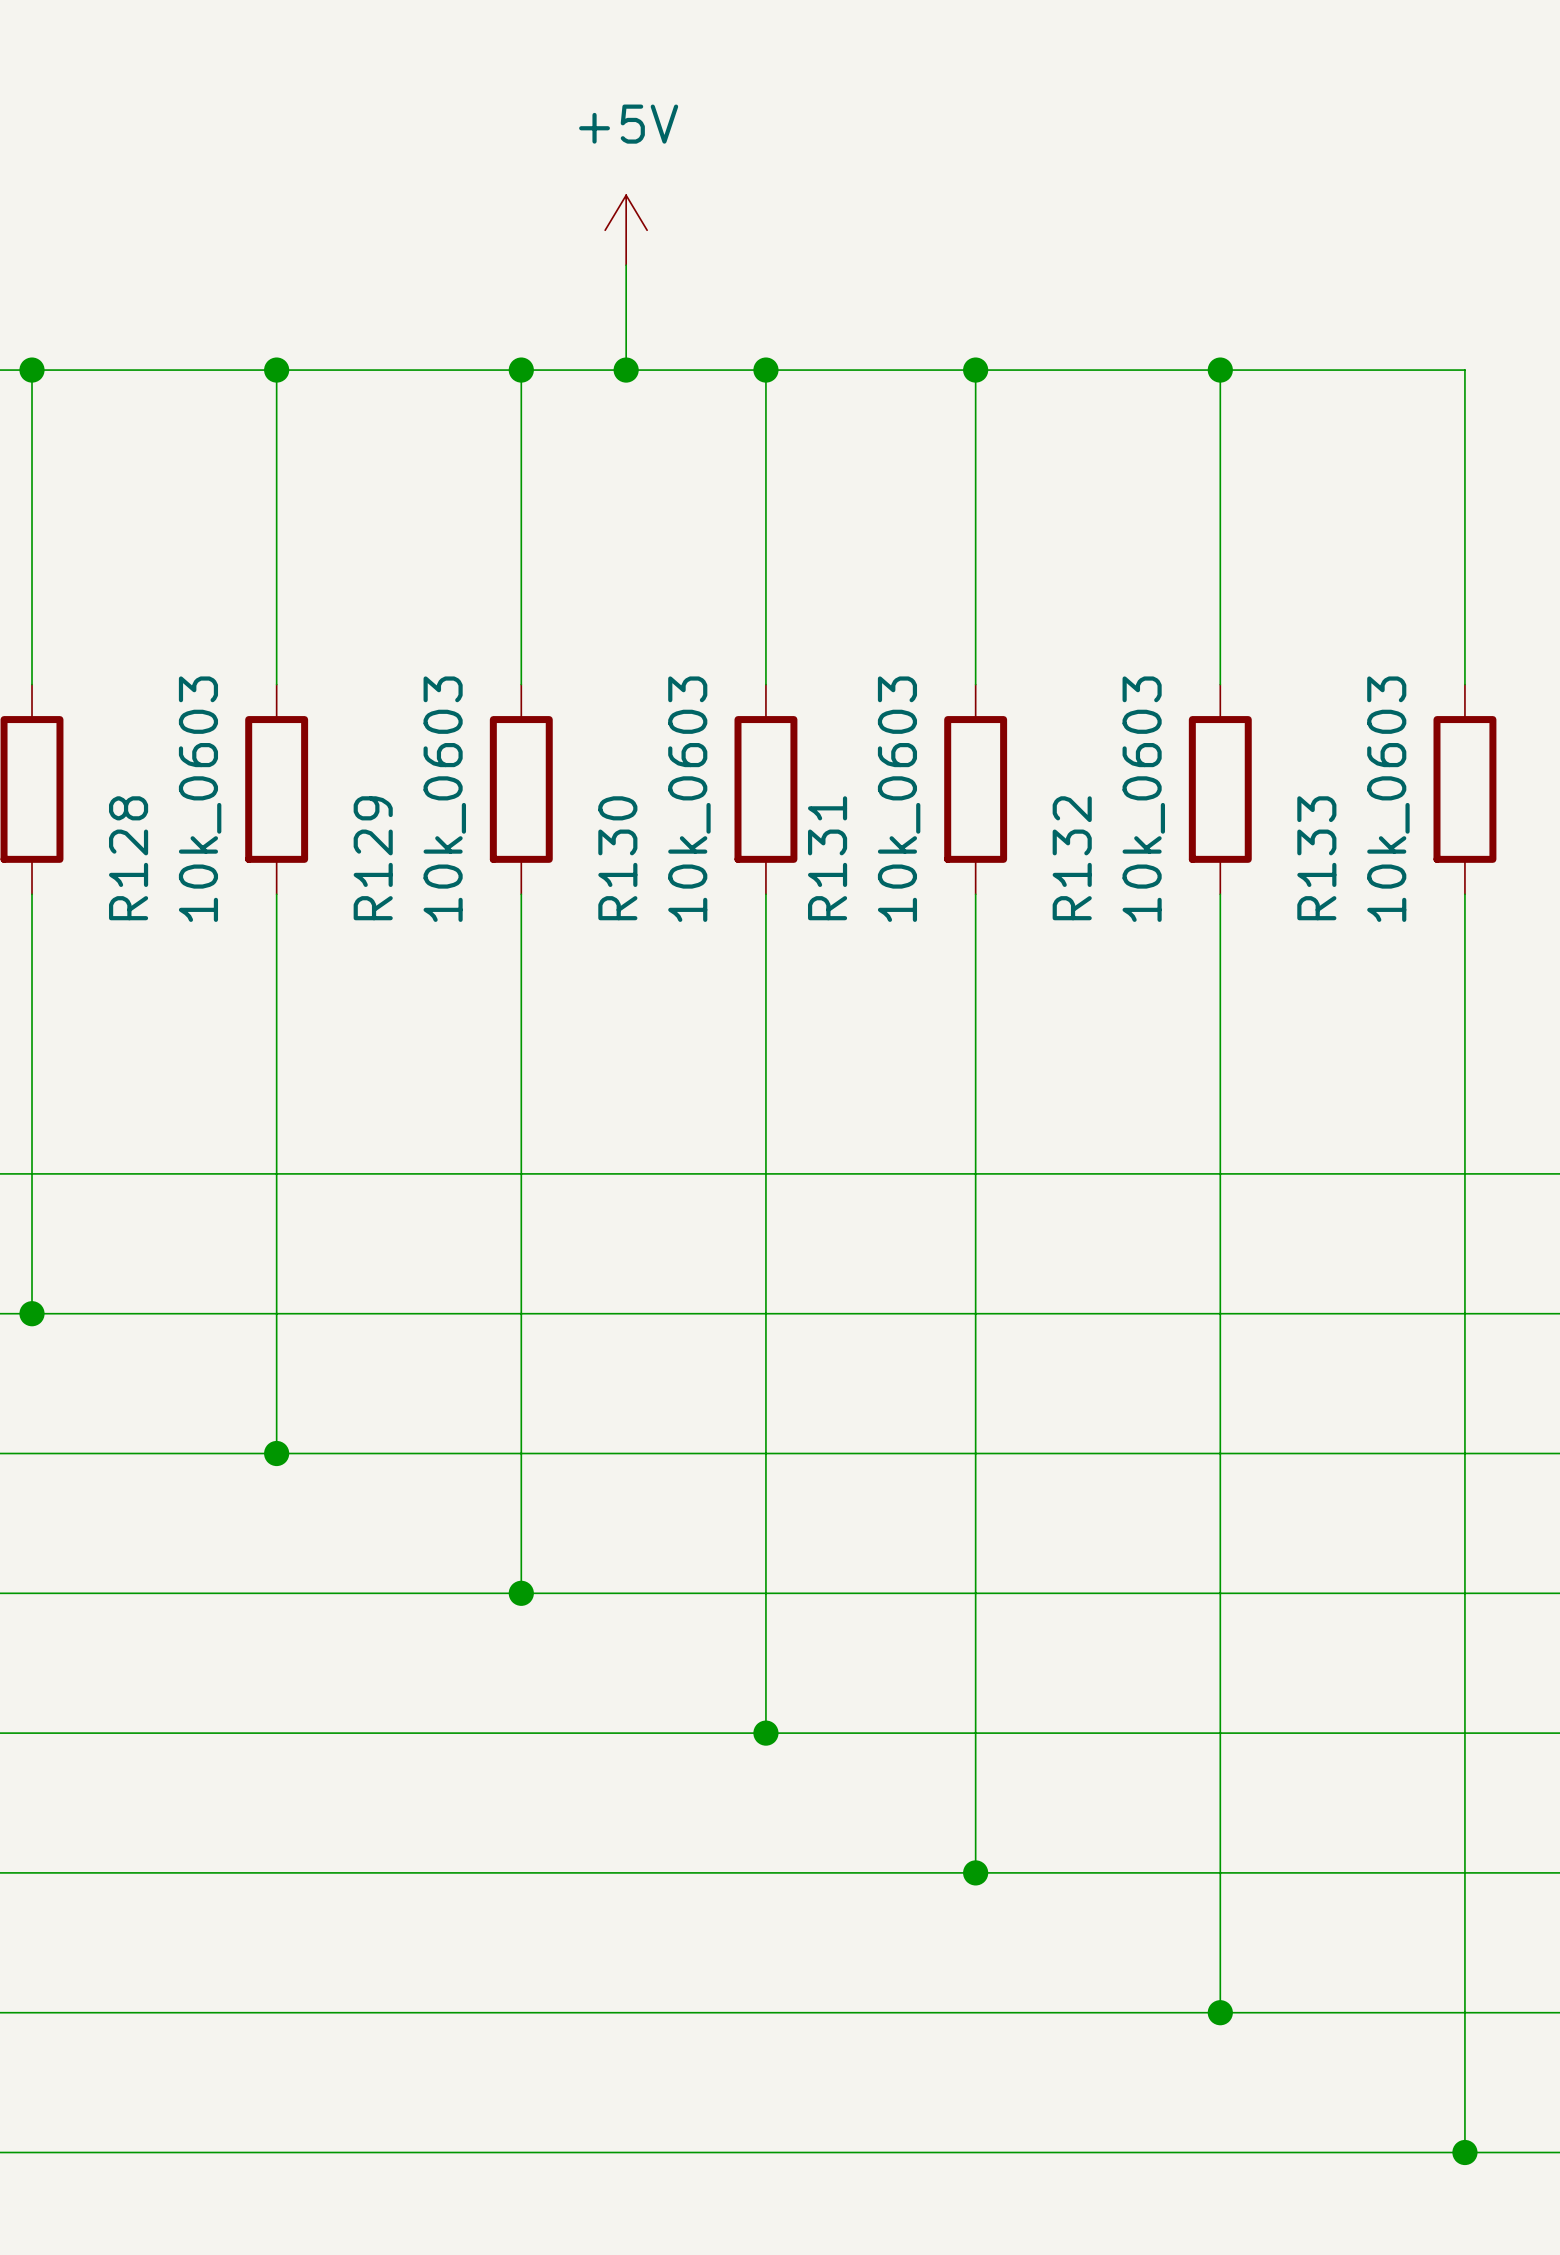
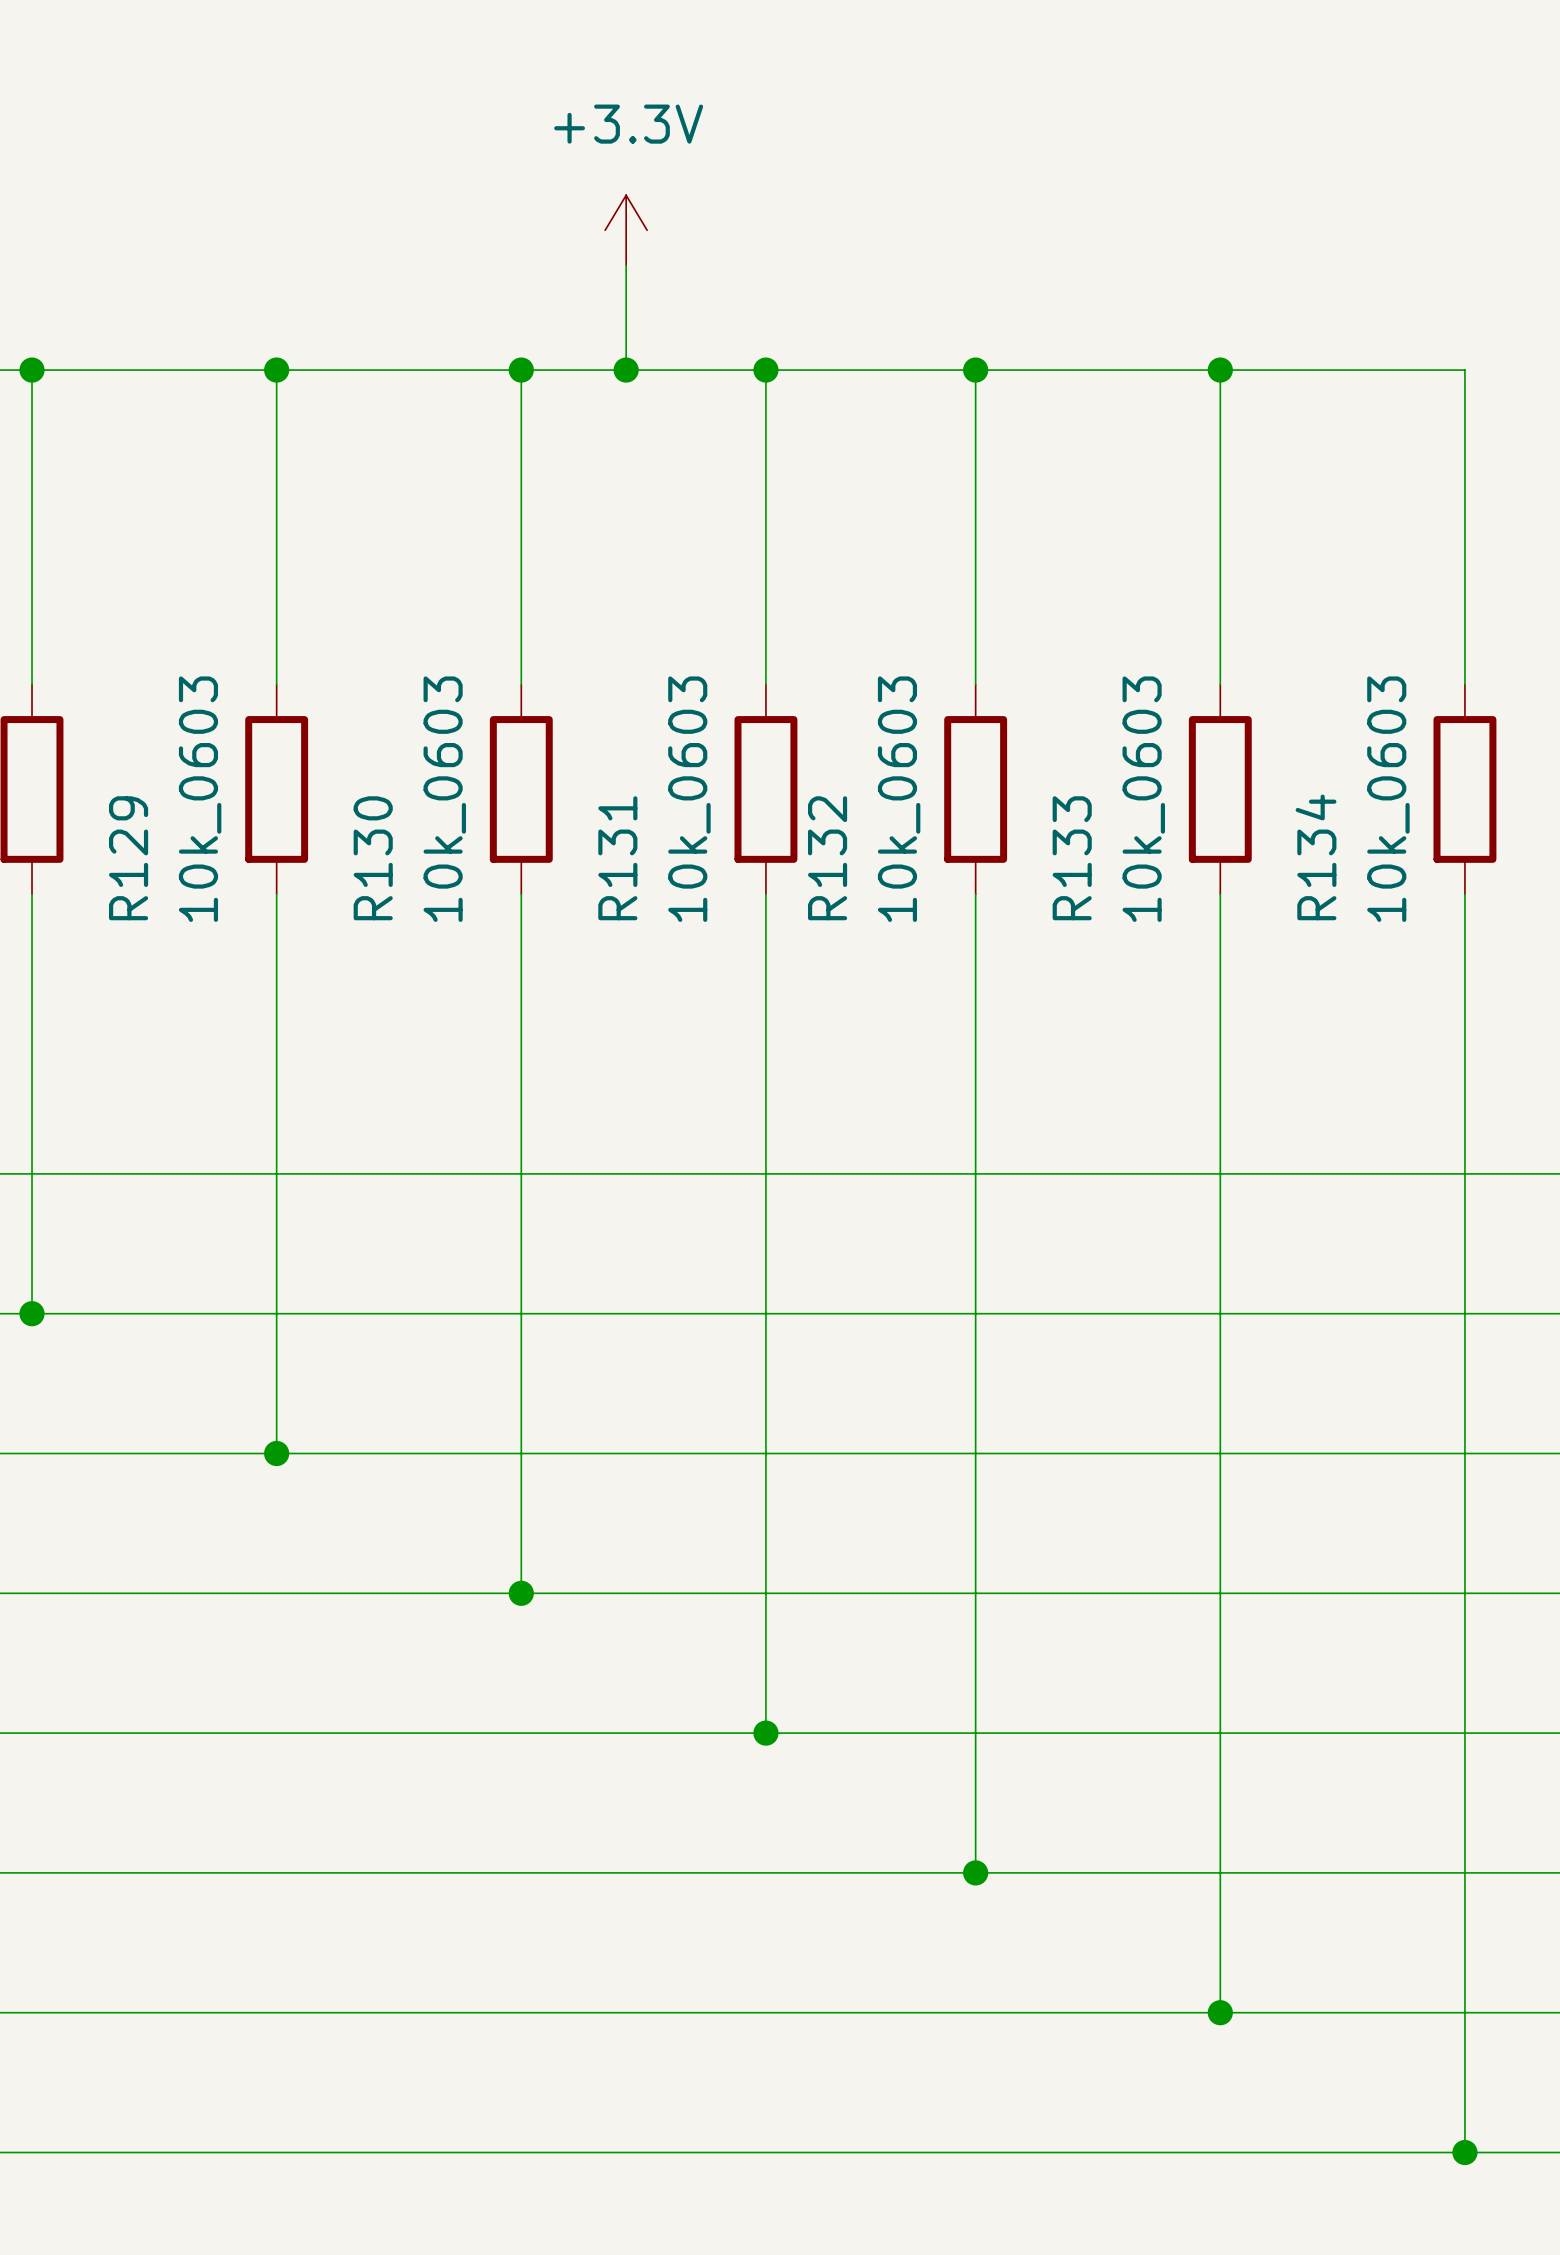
power symbol: +5V (626, 230) -> +3.3V (626, 230)
R128 name: R128 (128, 858) -> R129 (128, 858)
R129 name: R129 (373, 858) -> R130 (373, 858)
R130 name: R130 (617, 858) -> R131 (617, 858)
R131 name: R131 (827, 858) -> R132 (827, 858)
R132 name: R132 (1072, 858) -> R133 (1072, 858)
R133 name: R133 (1316, 858) -> R134 (1316, 857)

